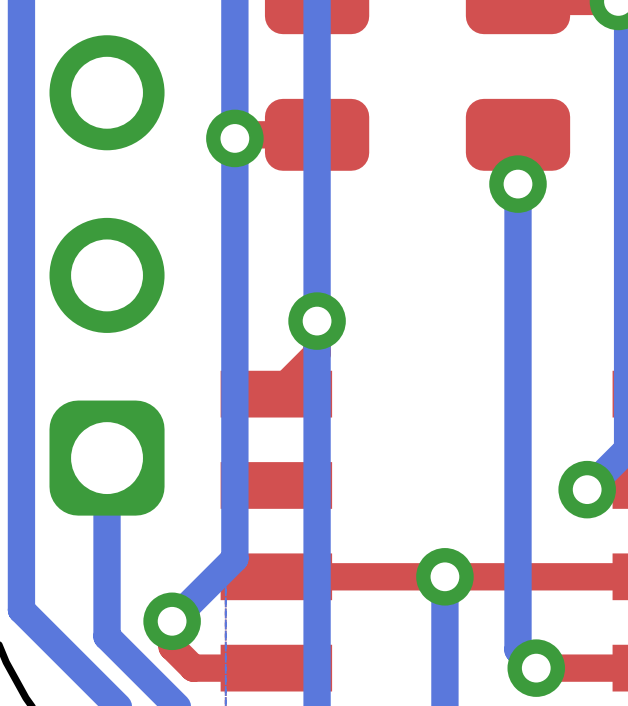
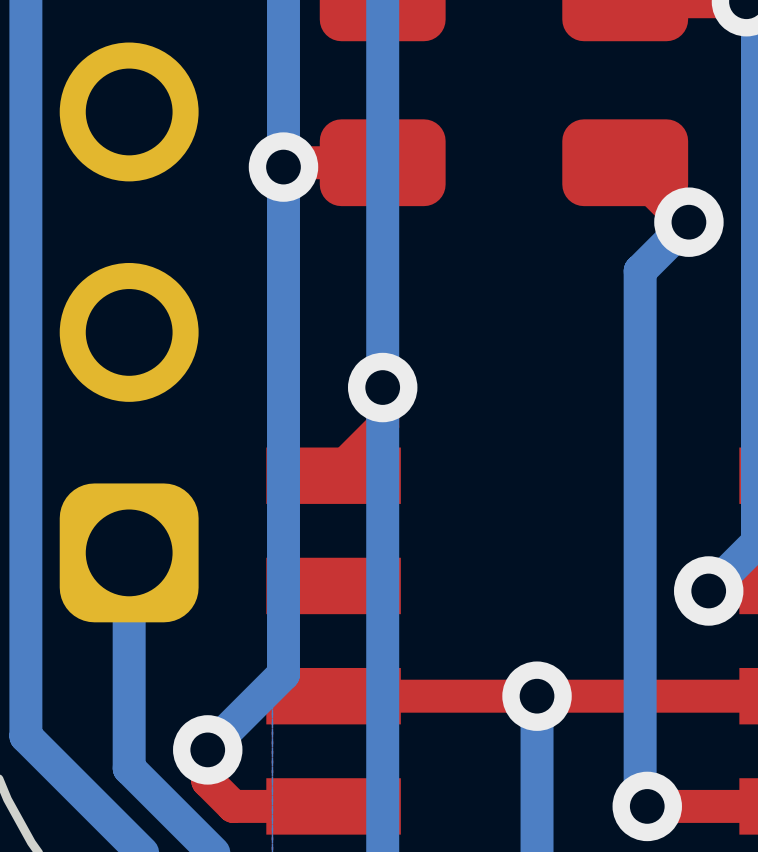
bottom track: (517, 184) (517, 649) (530, 662) -> (688, 222) (640, 270) (640, 799)
via position: (517, 184) -> (688, 222)

